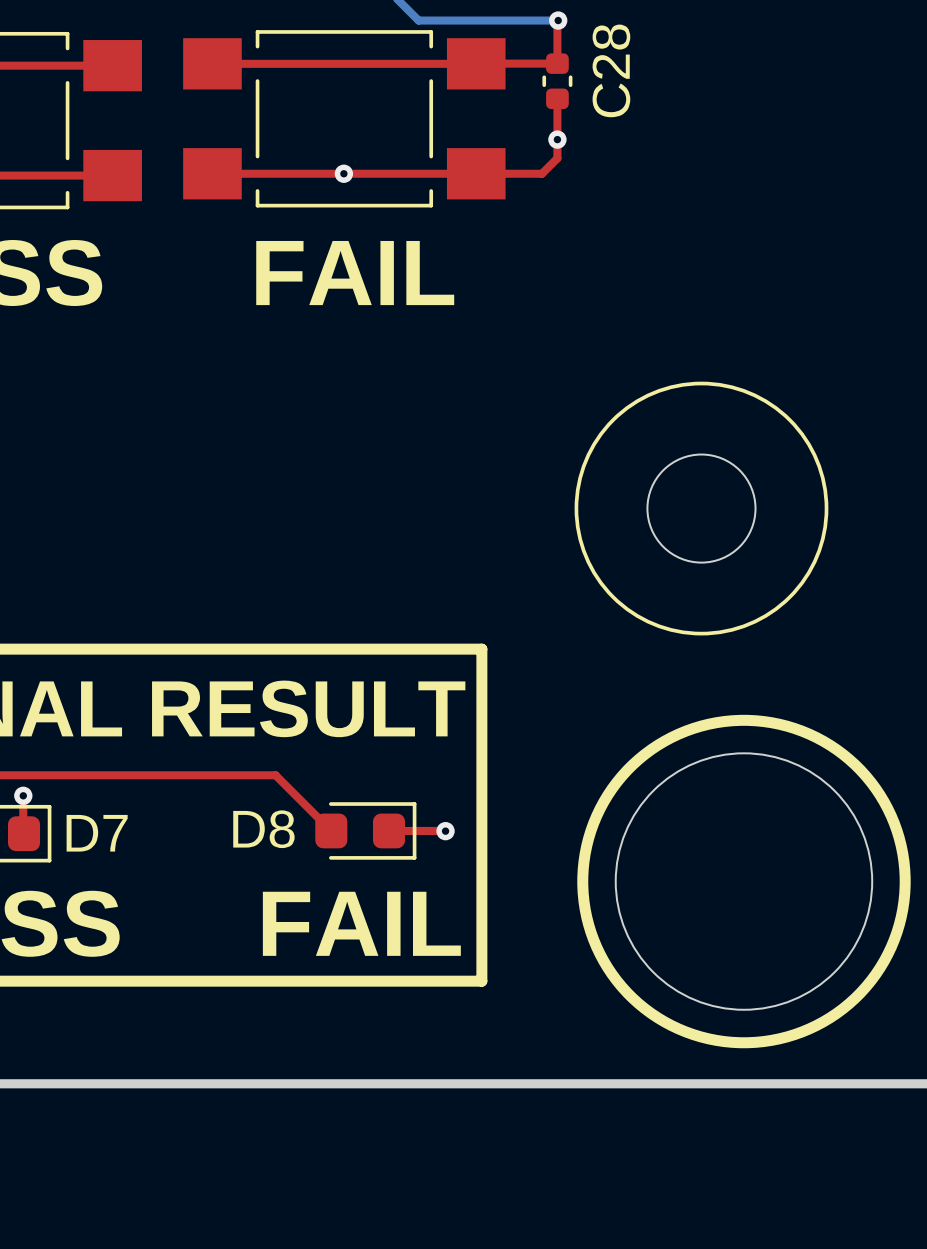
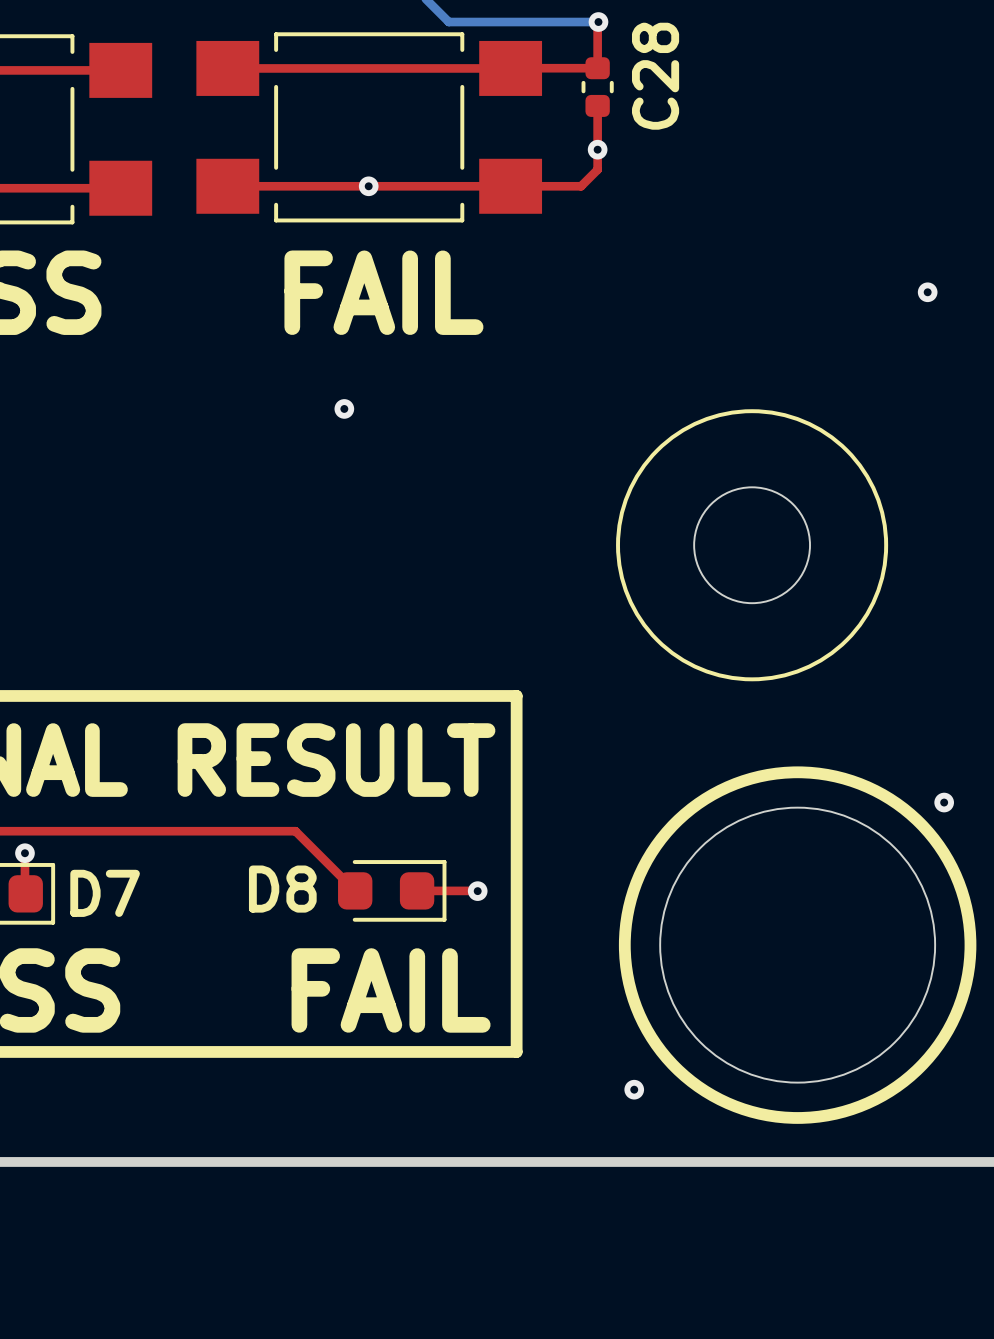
via: none -> (927, 292)
via: none -> (344, 408)
via: none -> (944, 802)
via: none -> (634, 1089)

